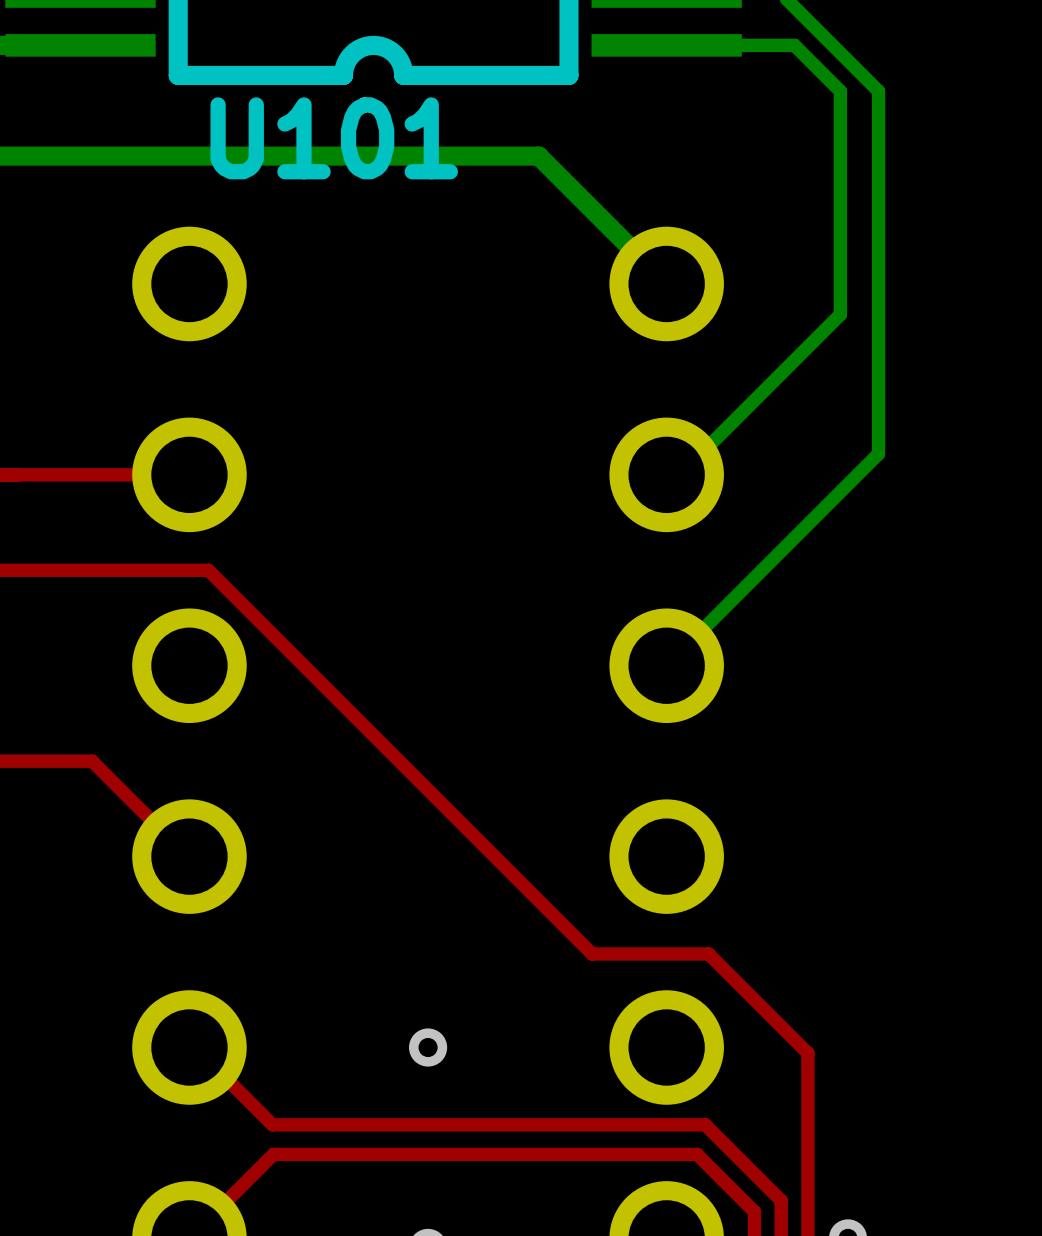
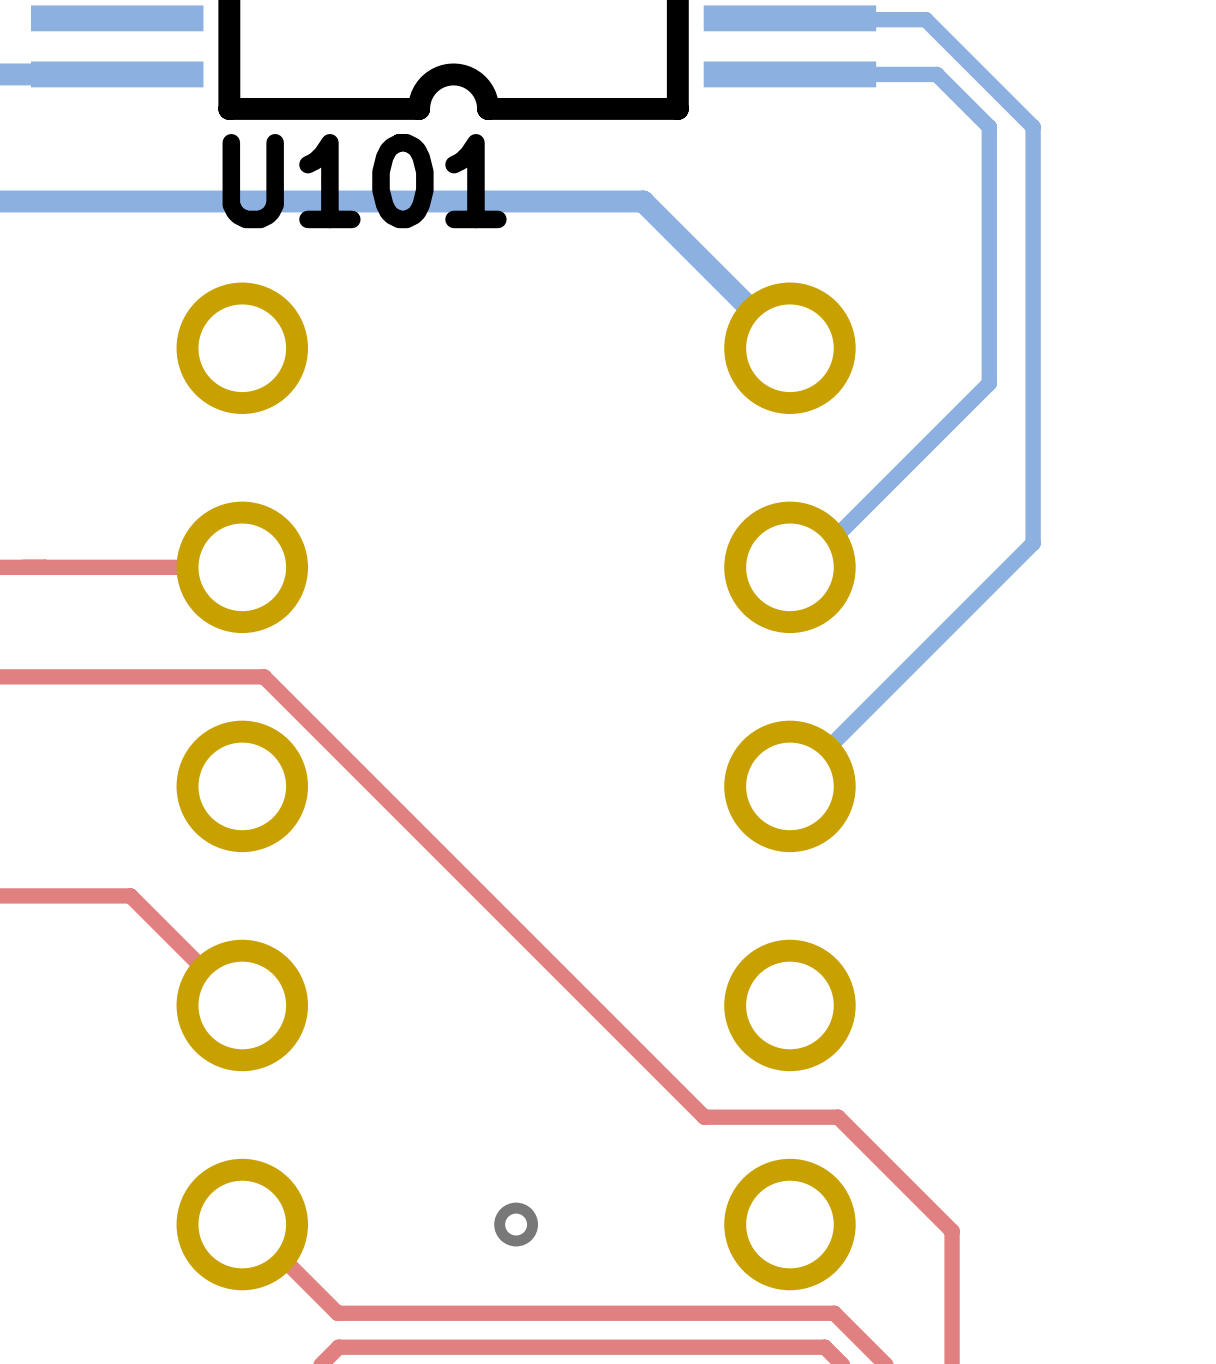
U101 name position: U101 (334, 138) -> U101 (364, 181)

